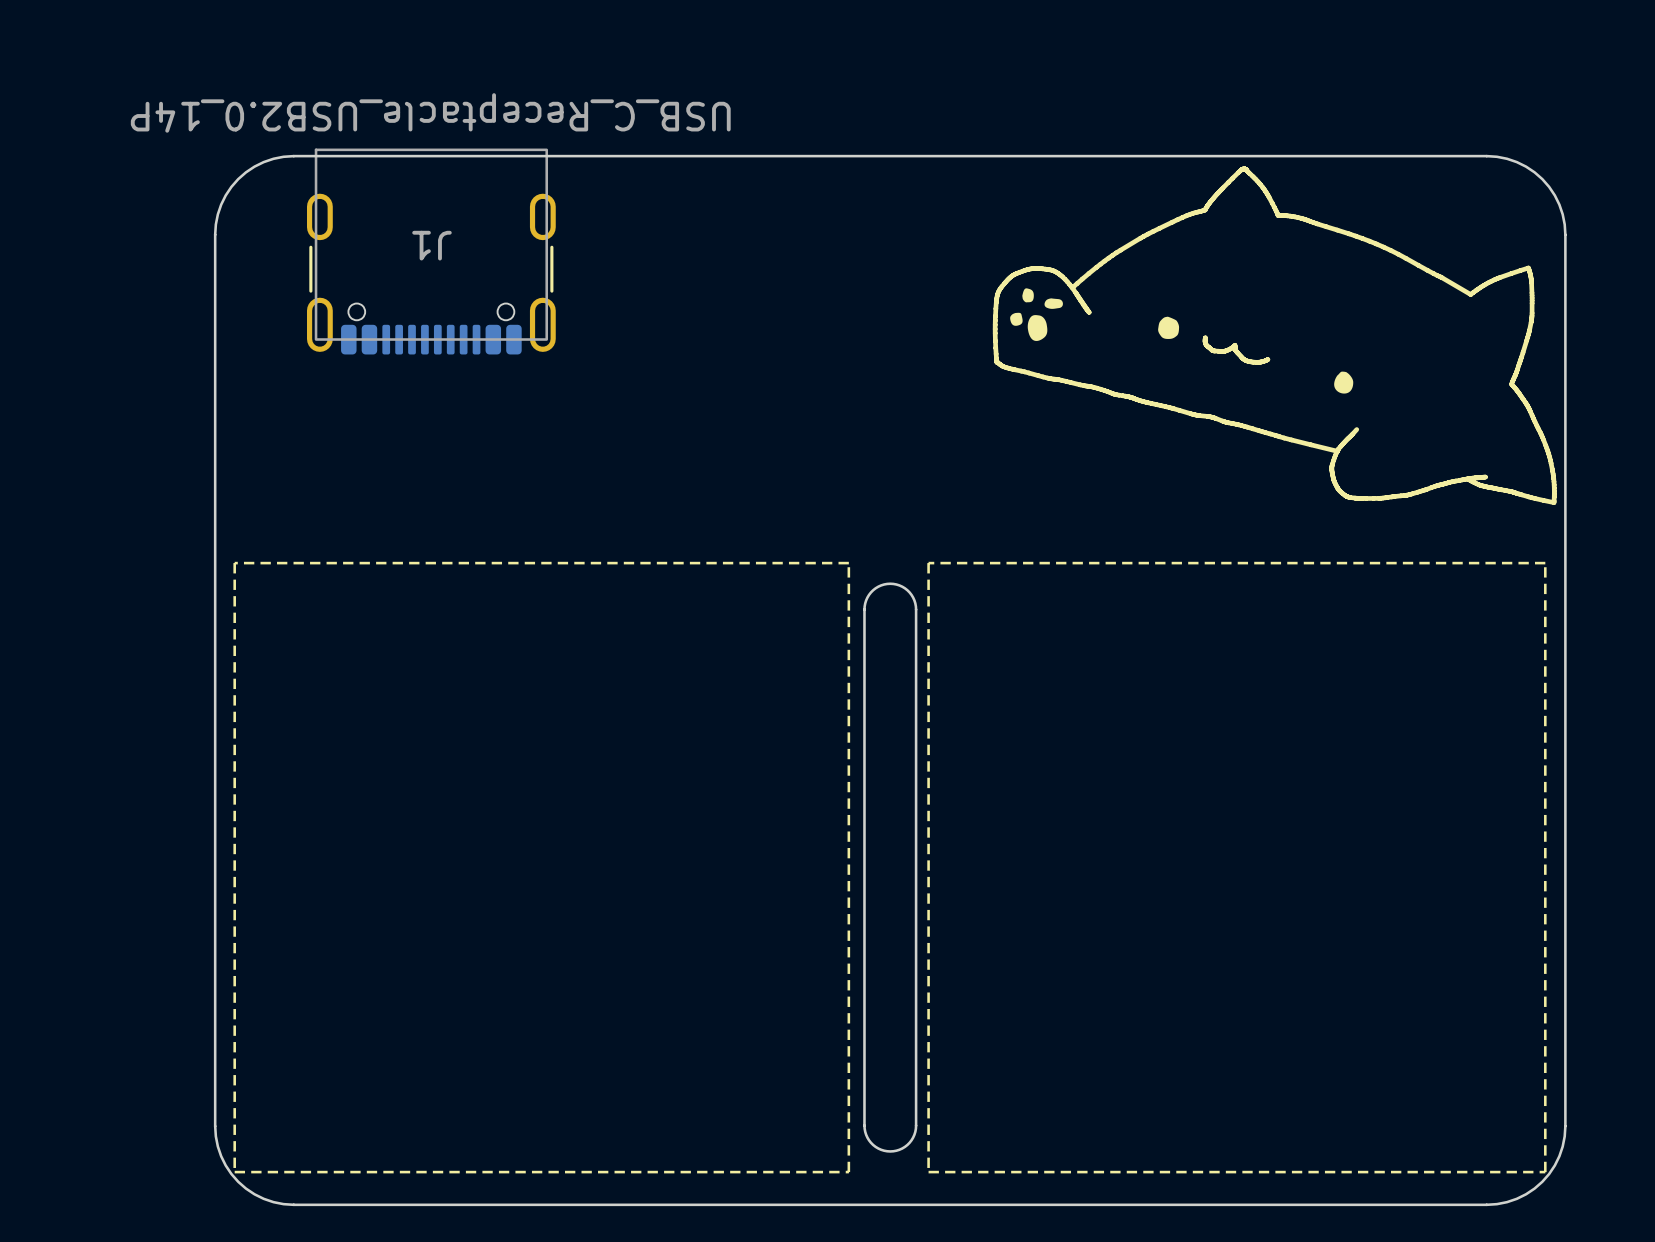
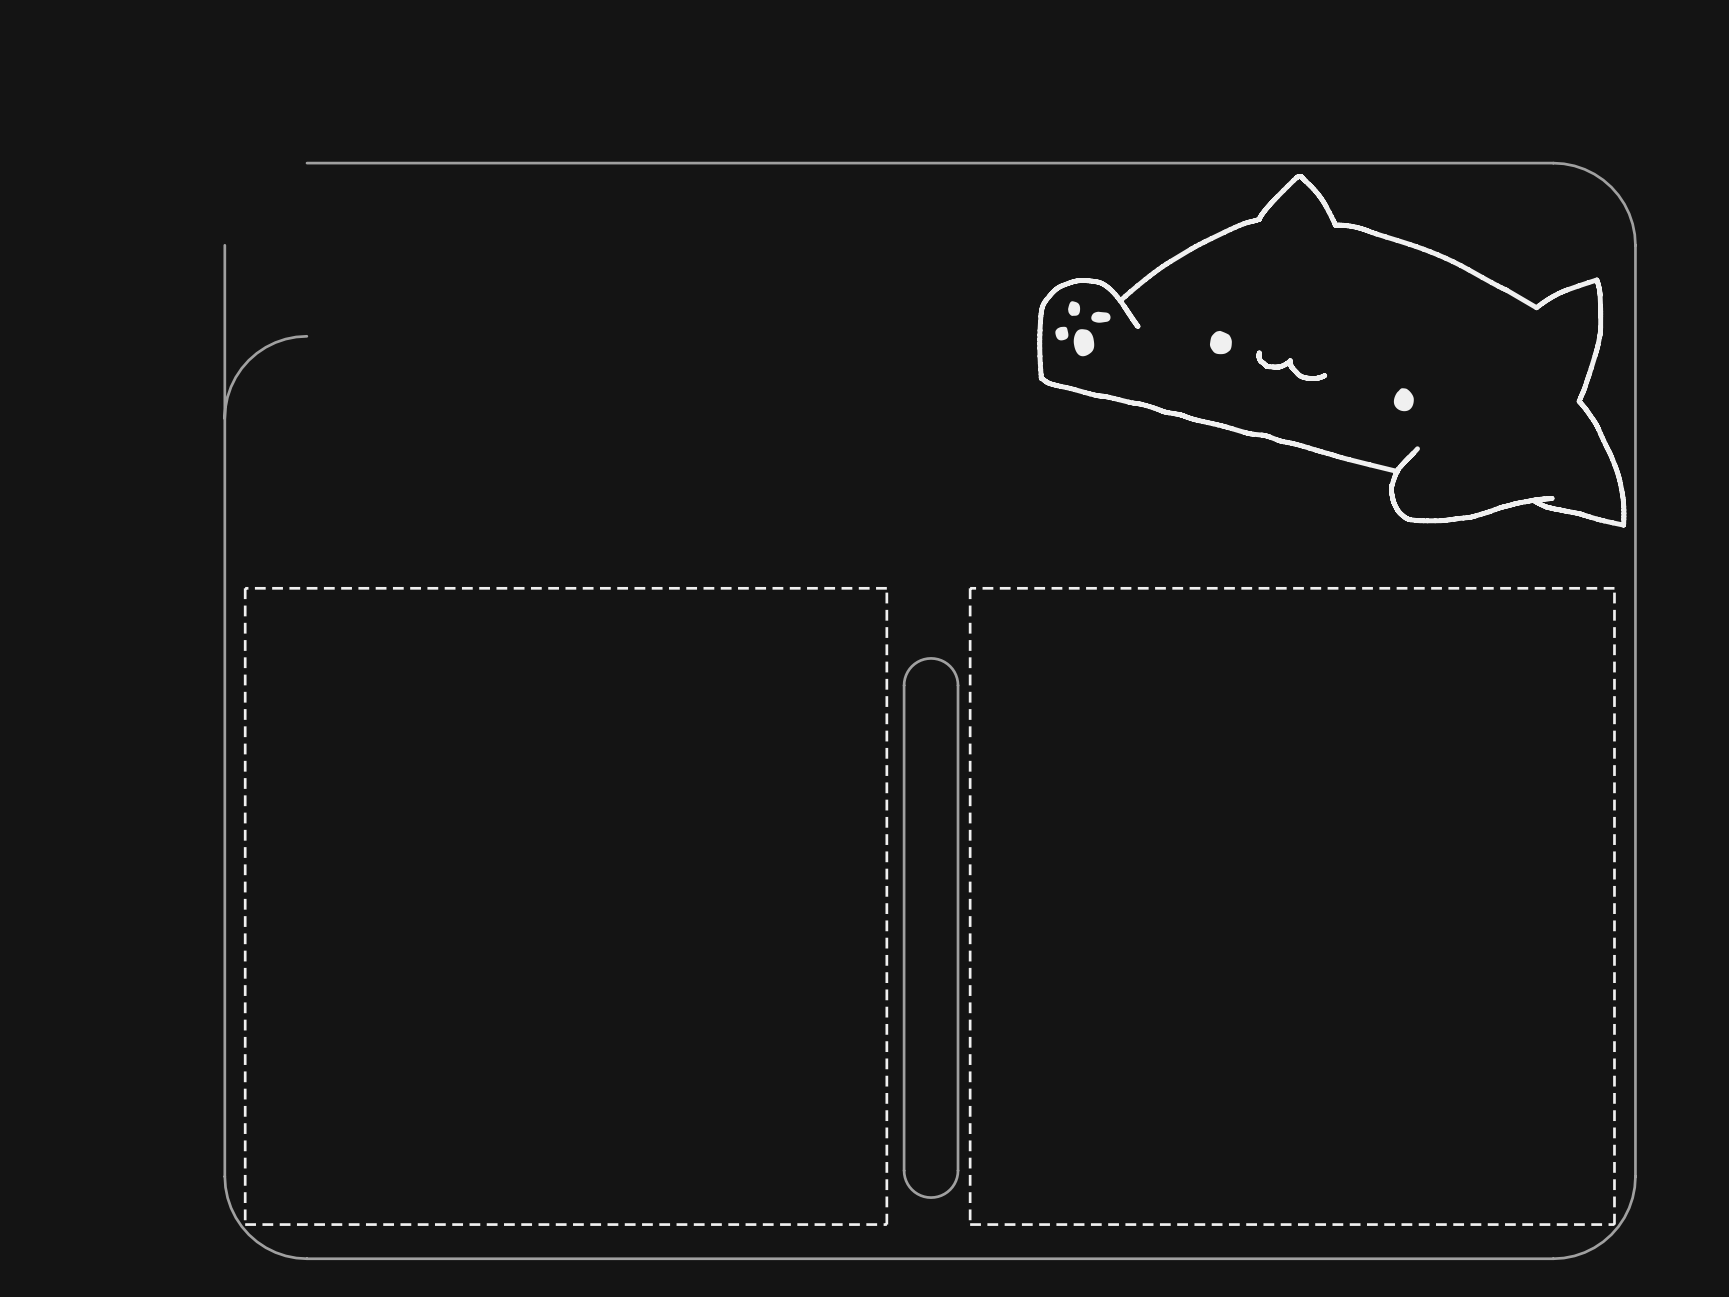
board edge: (293, 156) (263, 162) (238, 179) (221, 204) (215, 234) -> (306, 336) (275, 342) (248, 360) (230, 387) (224, 418)
J1: USB_C_Receptacle_USB2.0_14P (431, 251) -> none
board edge: (916, 609) (916, 1125) (914, 1134) (909, 1142) (899, 1149) (890, 1151) (881, 1149) (870, 1142) (866, 1134) (864, 1125) (864, 609) (866, 600) (870, 592) (878, 586) (890, 583) (902, 586) (909, 592) (914, 600) (916, 609) -> (958, 685) (958, 1170) (955, 1180) (950, 1189) (941, 1195) (931, 1197) (920, 1195) (911, 1189) (906, 1180) (904, 1170) (904, 685) (906, 675) (911, 666) (920, 660) (931, 658) (941, 660) (950, 666) (955, 675) (958, 685)

